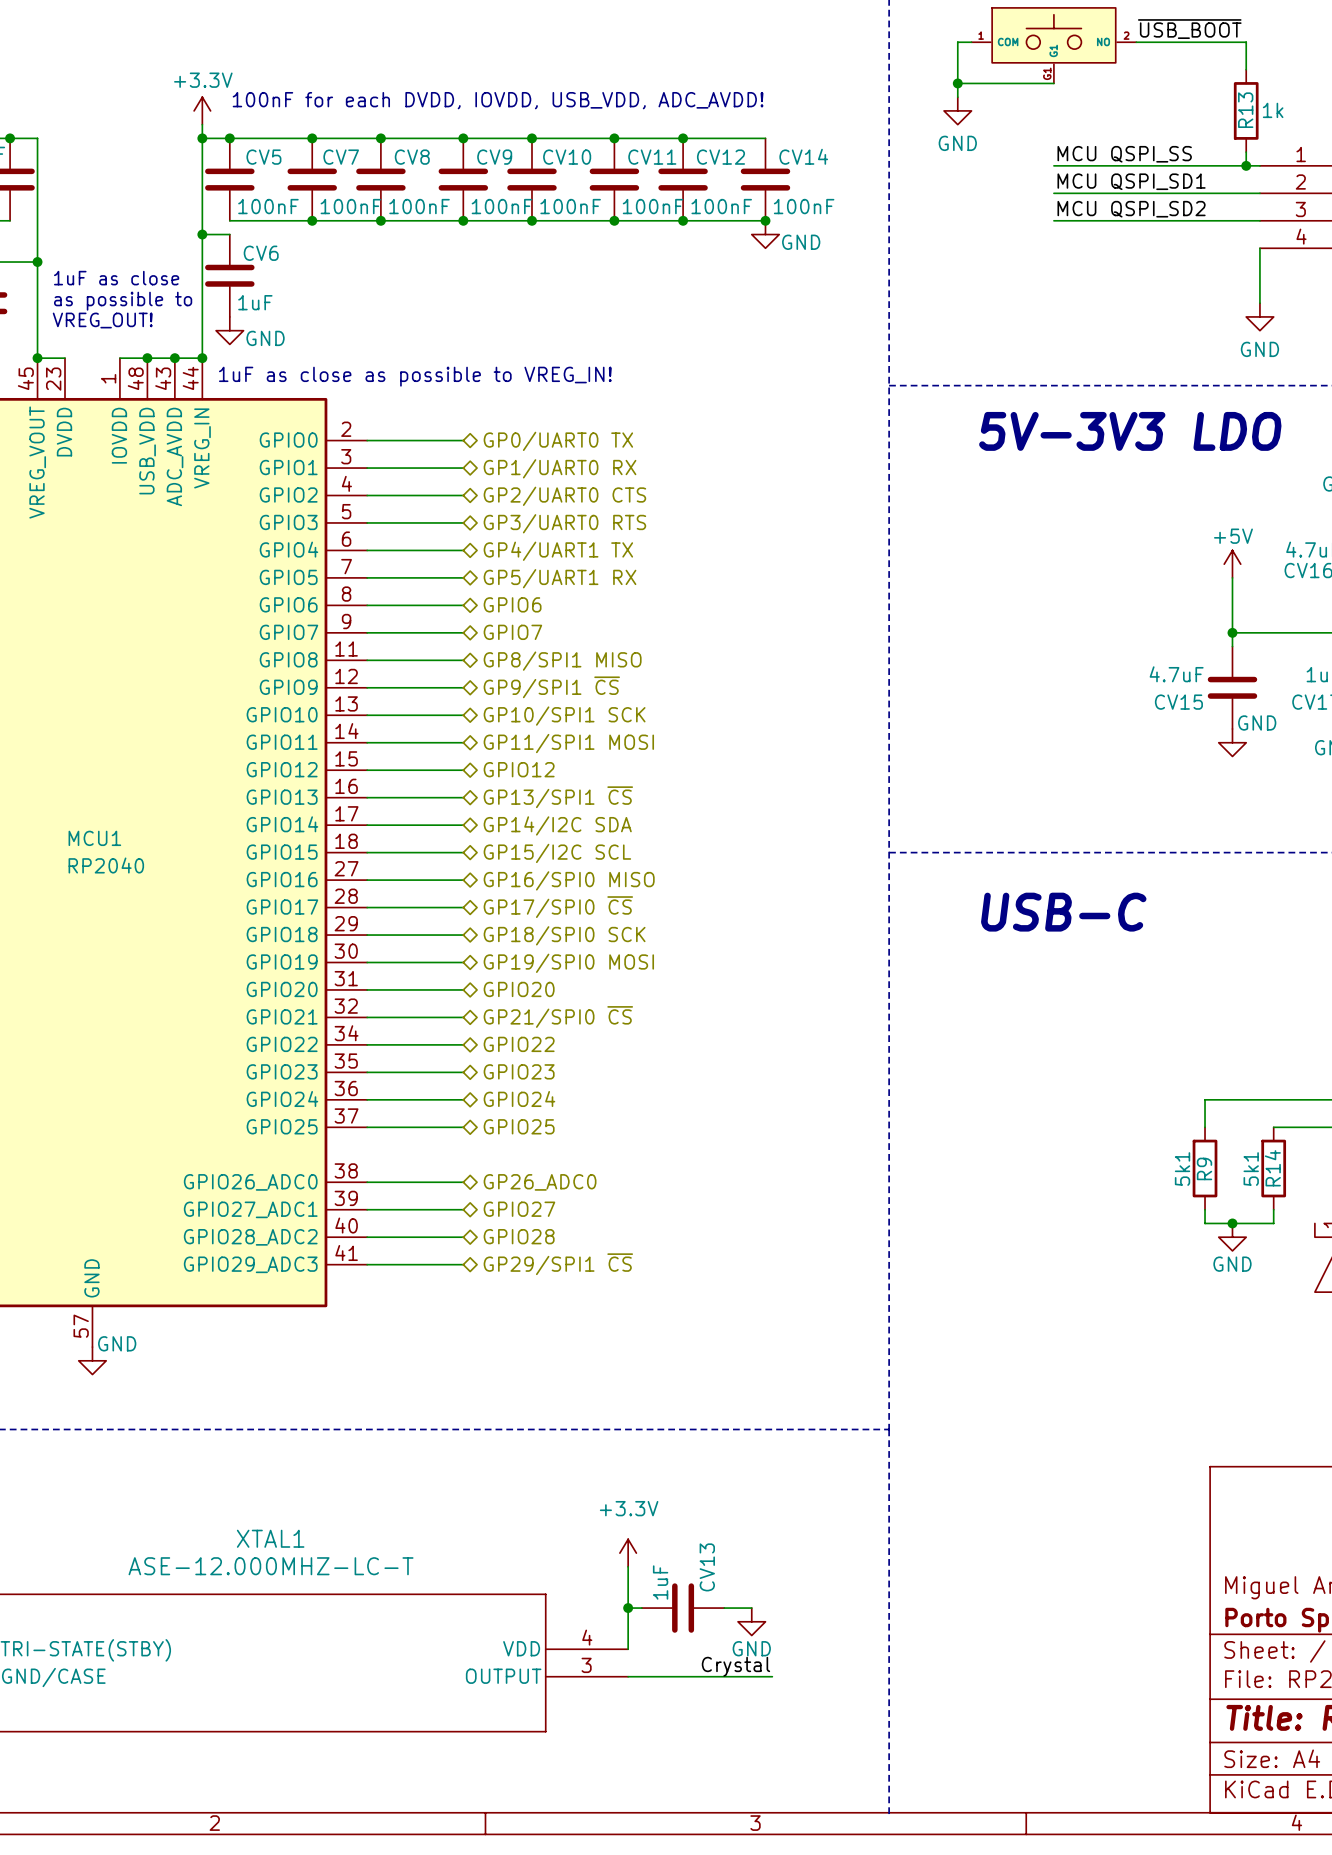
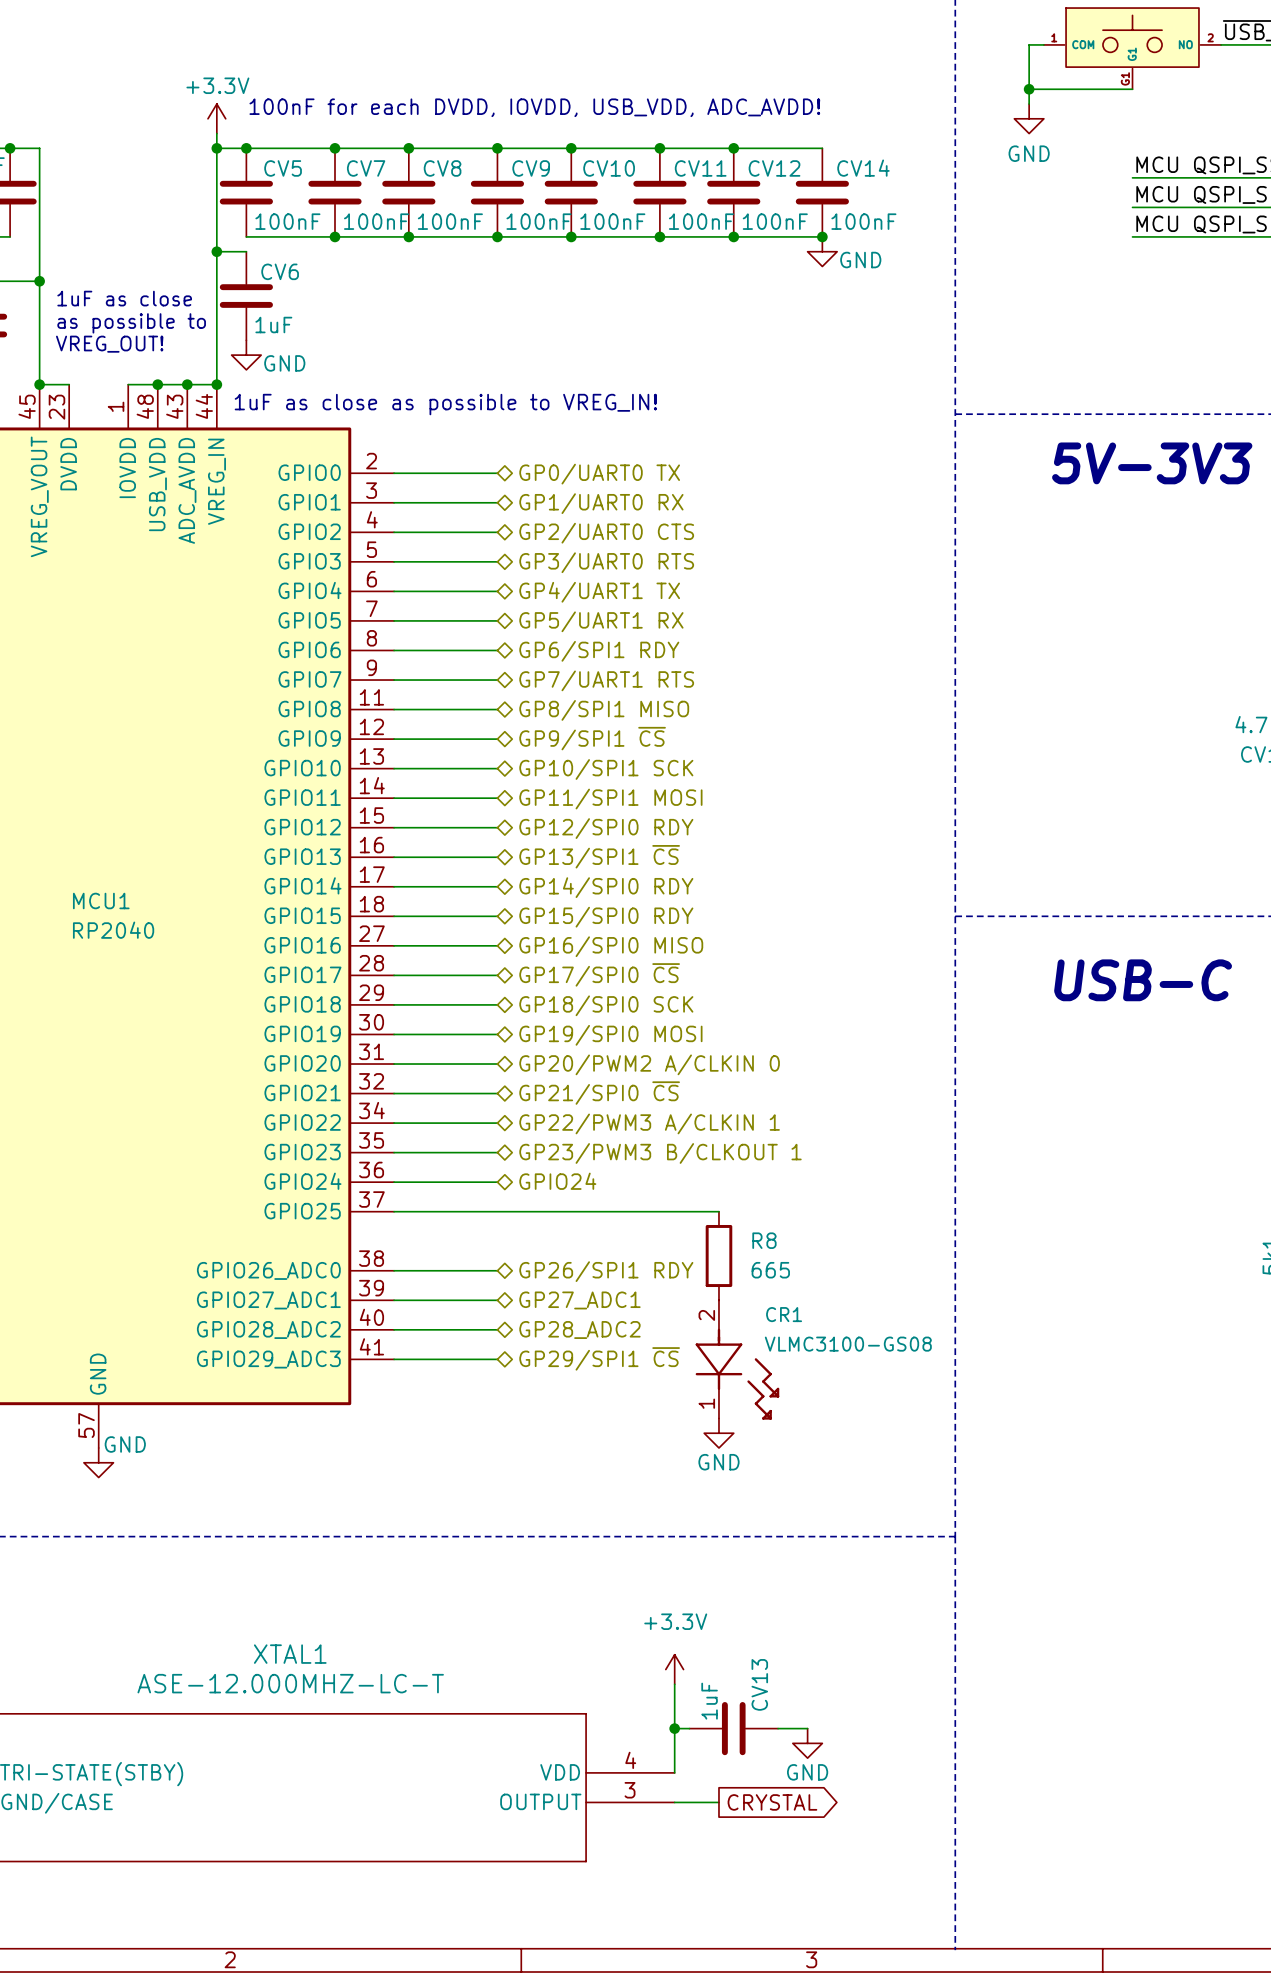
hierarchical label: GPIO6 (512, 604) -> GP6/SPI1 RDY (599, 651)
hierarchical label: GPIO7 (512, 632) -> GP7/UART1 RTS (606, 680)
hierarchical label: GPIO12 (519, 769) -> GP12/SPI0 RDY (606, 828)
hierarchical label: GP14/I2C SDA (557, 825) -> GP14/SPI0 RDY (606, 887)
hierarchical label: GP15/I2C SCL (557, 853) -> GP15/SPI0 RDY (606, 917)
hierarchical label: GPIO20 (519, 989) -> GP20/PWM2 A/CLKIN 0 (649, 1064)
hierarchical label: GPIO22 (519, 1044) -> GP22/PWM3 A/CLKIN 1 (649, 1123)
hierarchical label: GPIO23 (519, 1071) -> GP23/PWM3 B/CLKOUT 1 (660, 1153)
hierarchical label: GPIO25 (519, 1126) -> none
wire: none -> (497, 1211) (718, 1211)
R8: none -> 665 (718, 1256)
hierarchical label: GP26_ADC0 (540, 1182) -> GP26/SPI1 RDY (606, 1271)
hierarchical label: GPIO27 (519, 1209) -> GP27_ADC1 (579, 1300)
hierarchical label: GPIO28 (519, 1236) -> GP28_ADC2 (579, 1329)
CR1: none -> VLMC3100-GS08 (737, 1359)
power symbol: none -> GND (718, 1433)
label: Crystal (735, 1666) -> none
wire: (669, 1676) (772, 1676) -> none
global label: none -> CRYSTAL (772, 1802)

